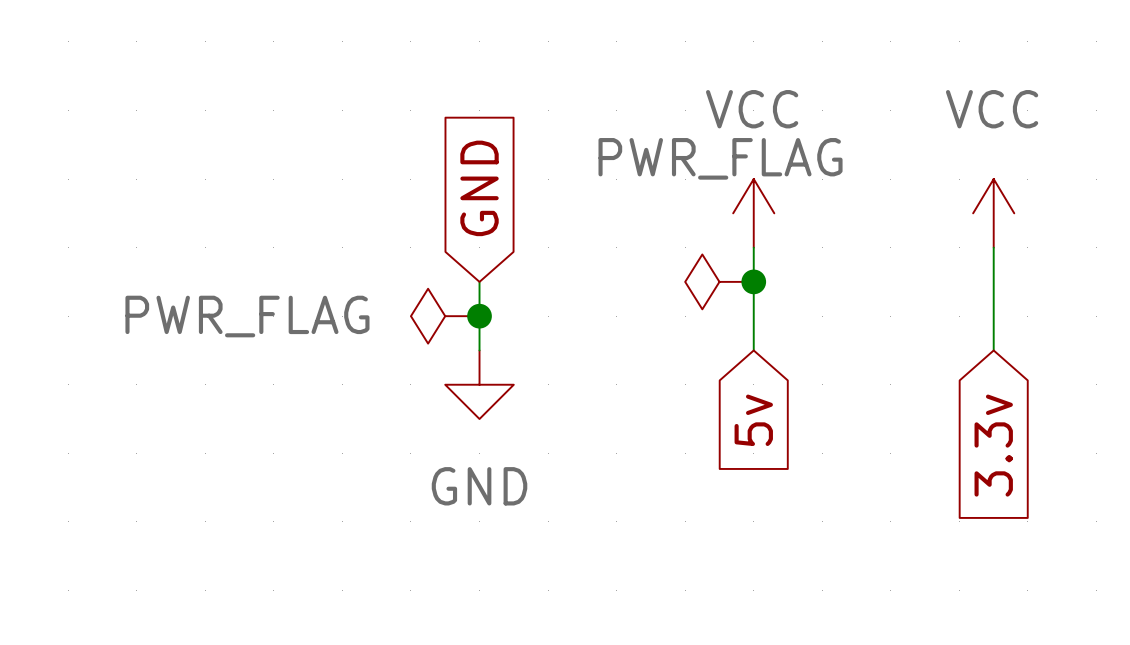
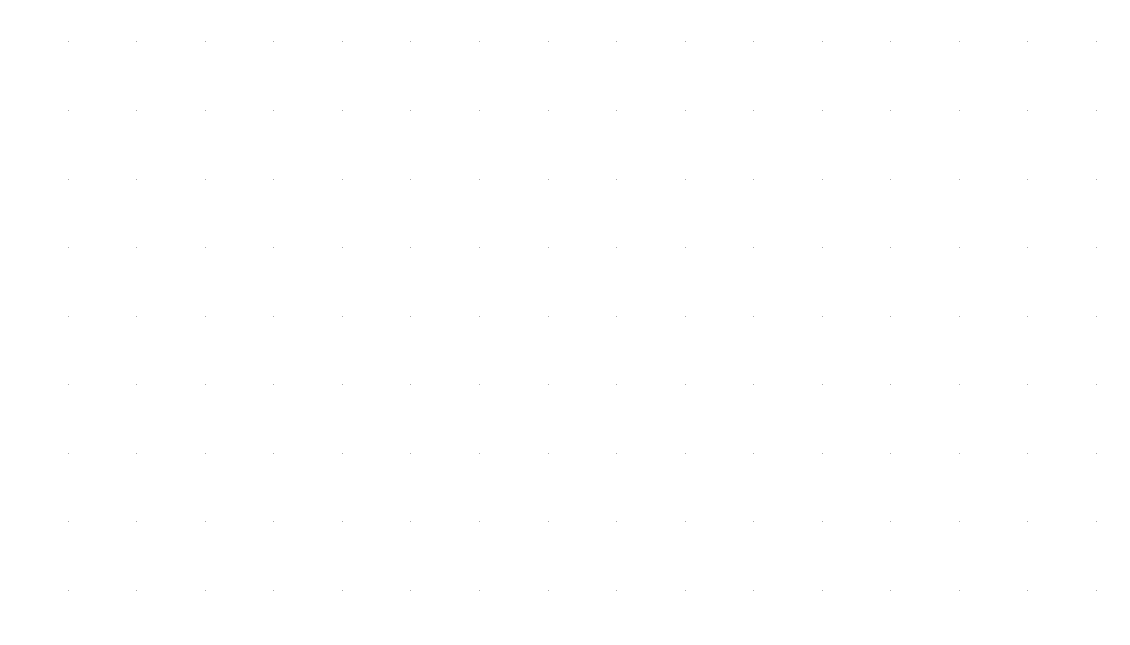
global label: GND (479, 188) -> none
power symbol: VCC (753, 213) -> none
power symbol: VCC (993, 213) -> none
wire: (753, 247) (753, 350) -> none
wire: (993, 247) (993, 350) -> none
wire: (479, 281) (479, 350) -> none
power symbol: PWR_FLAG (719, 281) -> none
junction: (753, 281) -> none
power symbol: PWR_FLAG (445, 316) -> none
junction: (479, 316) -> none
power symbol: GND (479, 384) -> none
global label: 5v (753, 420) -> none
global label: 3.3v (993, 445) -> none

